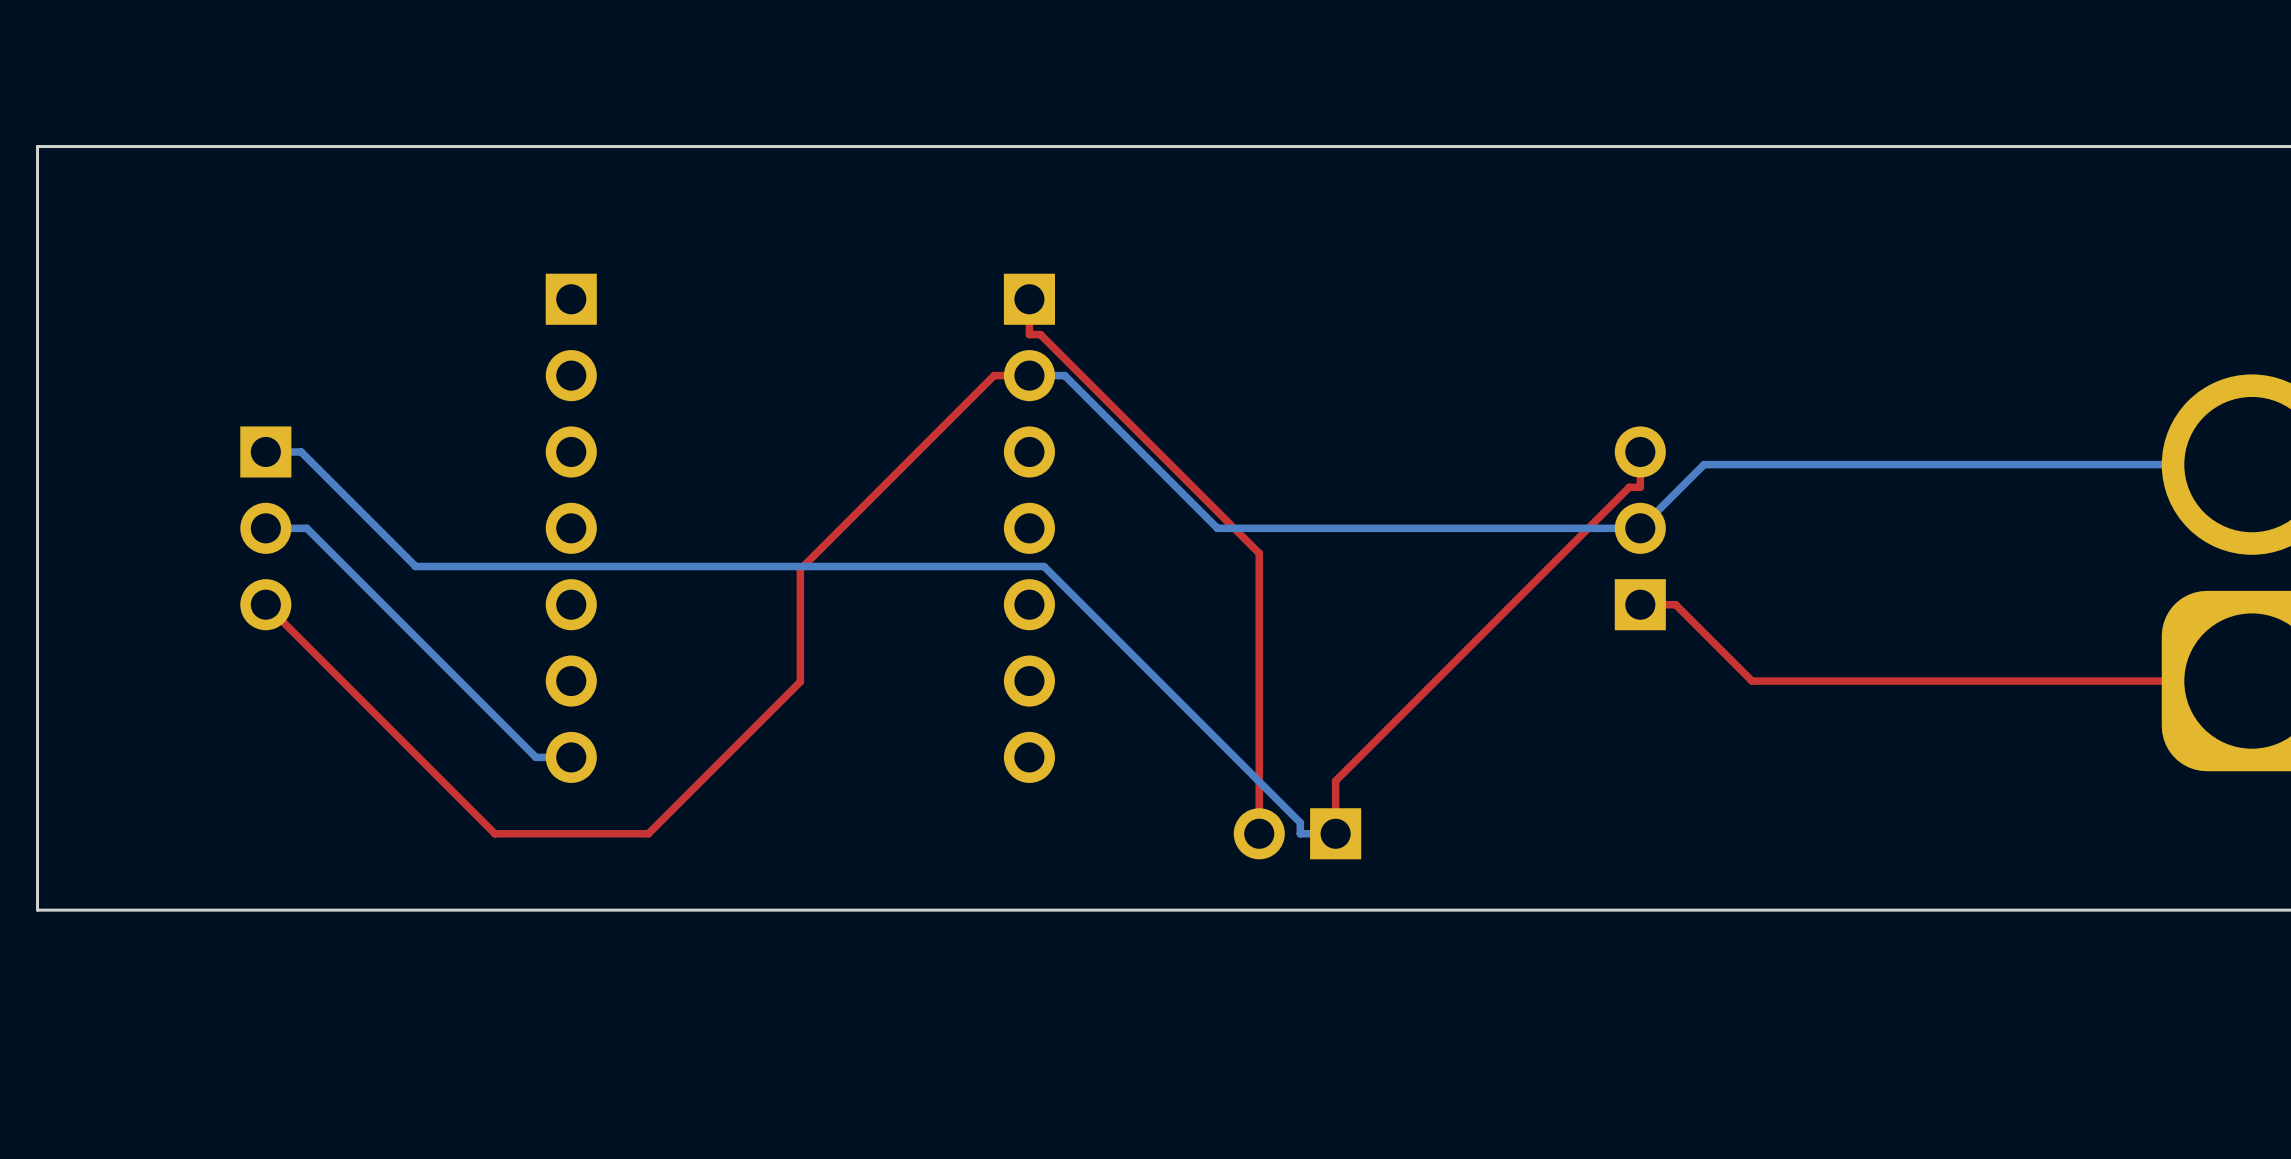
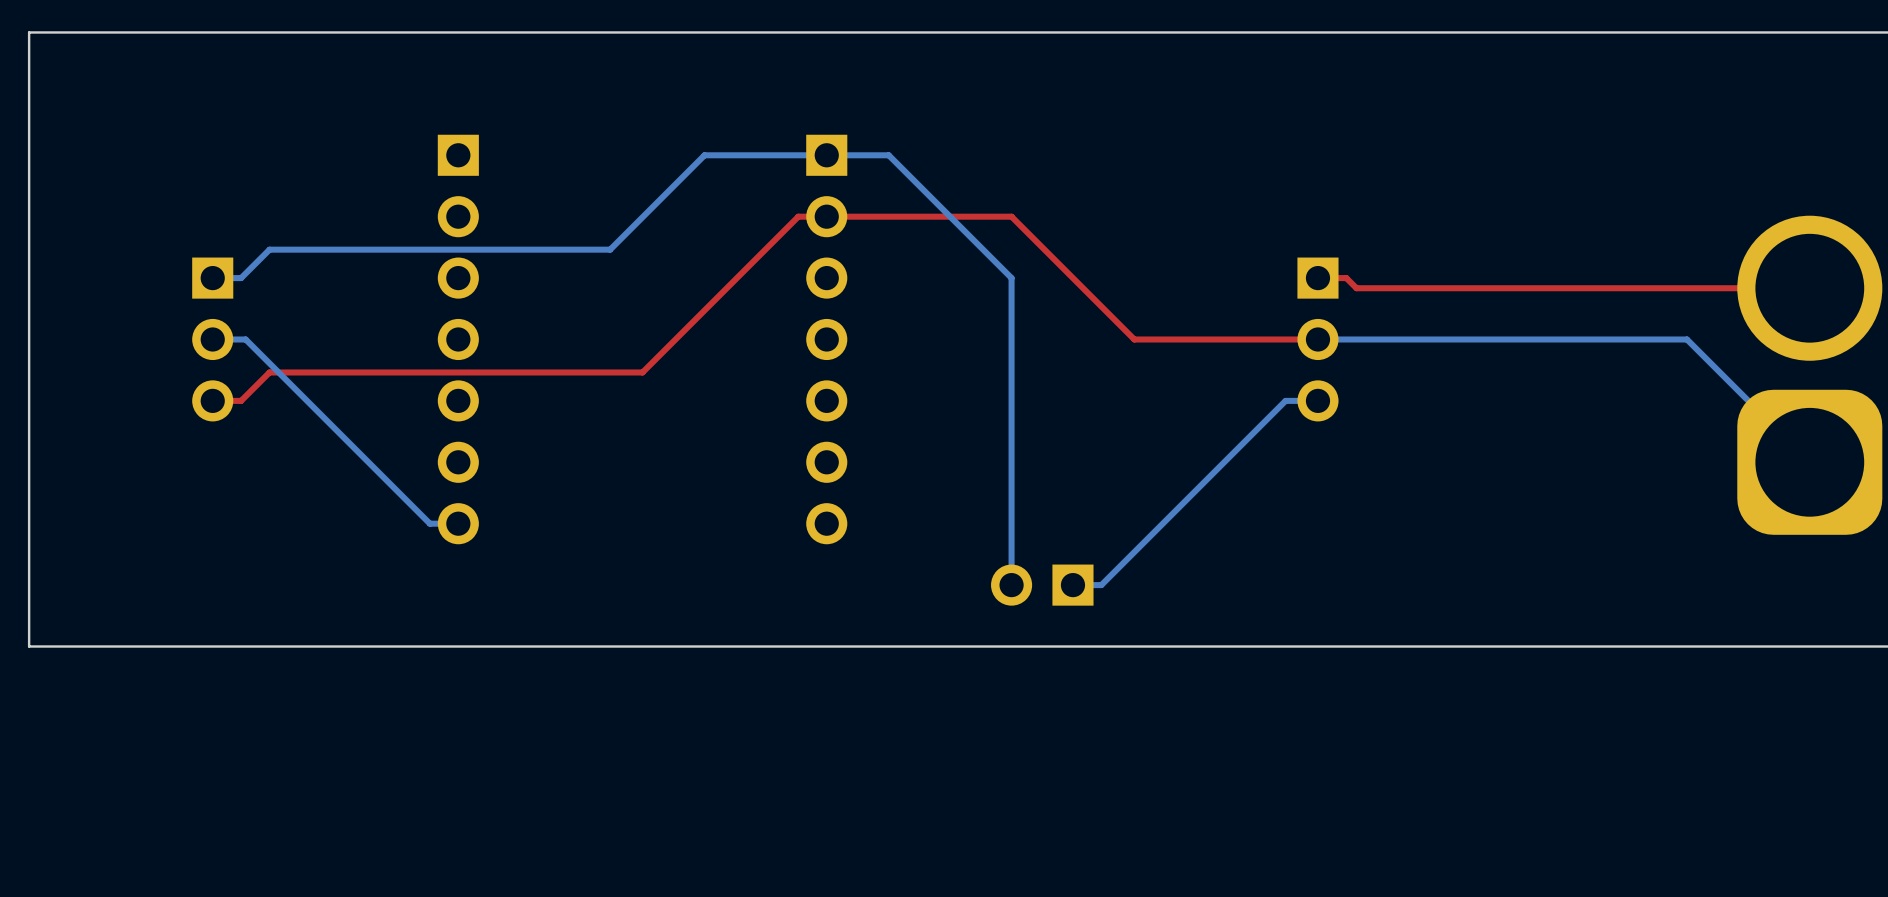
top track: (1029, 299) (1029, 334) (1040, 334) (1259, 553) (1259, 833) -> none
top track: none -> (826, 216) (1011, 216) (1134, 339) (1317, 339)
bottom track: (1029, 375) (1064, 375) (1217, 528) (1640, 528) (1704, 464) (2251, 464) -> none
bottom track: (301, 451) (415, 566) (1044, 566) (1300, 822) (1300, 833) (1335, 833) -> (241, 278) (269, 249) (610, 249) (704, 155) (888, 155) (1011, 278) (1011, 585)
top track: (1640, 451) (1640, 487) (1629, 487) (1335, 780) (1335, 833) -> (1317, 278) (1346, 278) (1356, 288) (1809, 288)
bottom track: none -> (1317, 339) (1687, 339) (1809, 462)
part rotation: 0° (1640, 528) -> 180° (1317, 339)
top track: (800, 569) (800, 681) (648, 833) (494, 833) (265, 604) -> (642, 372) (269, 372) (241, 400) (212, 400)
top track: (1640, 604) (1675, 604) (1752, 681) (2251, 681) -> none
bottom track: none -> (1317, 400) (1285, 400) (1101, 585) (1072, 585)

